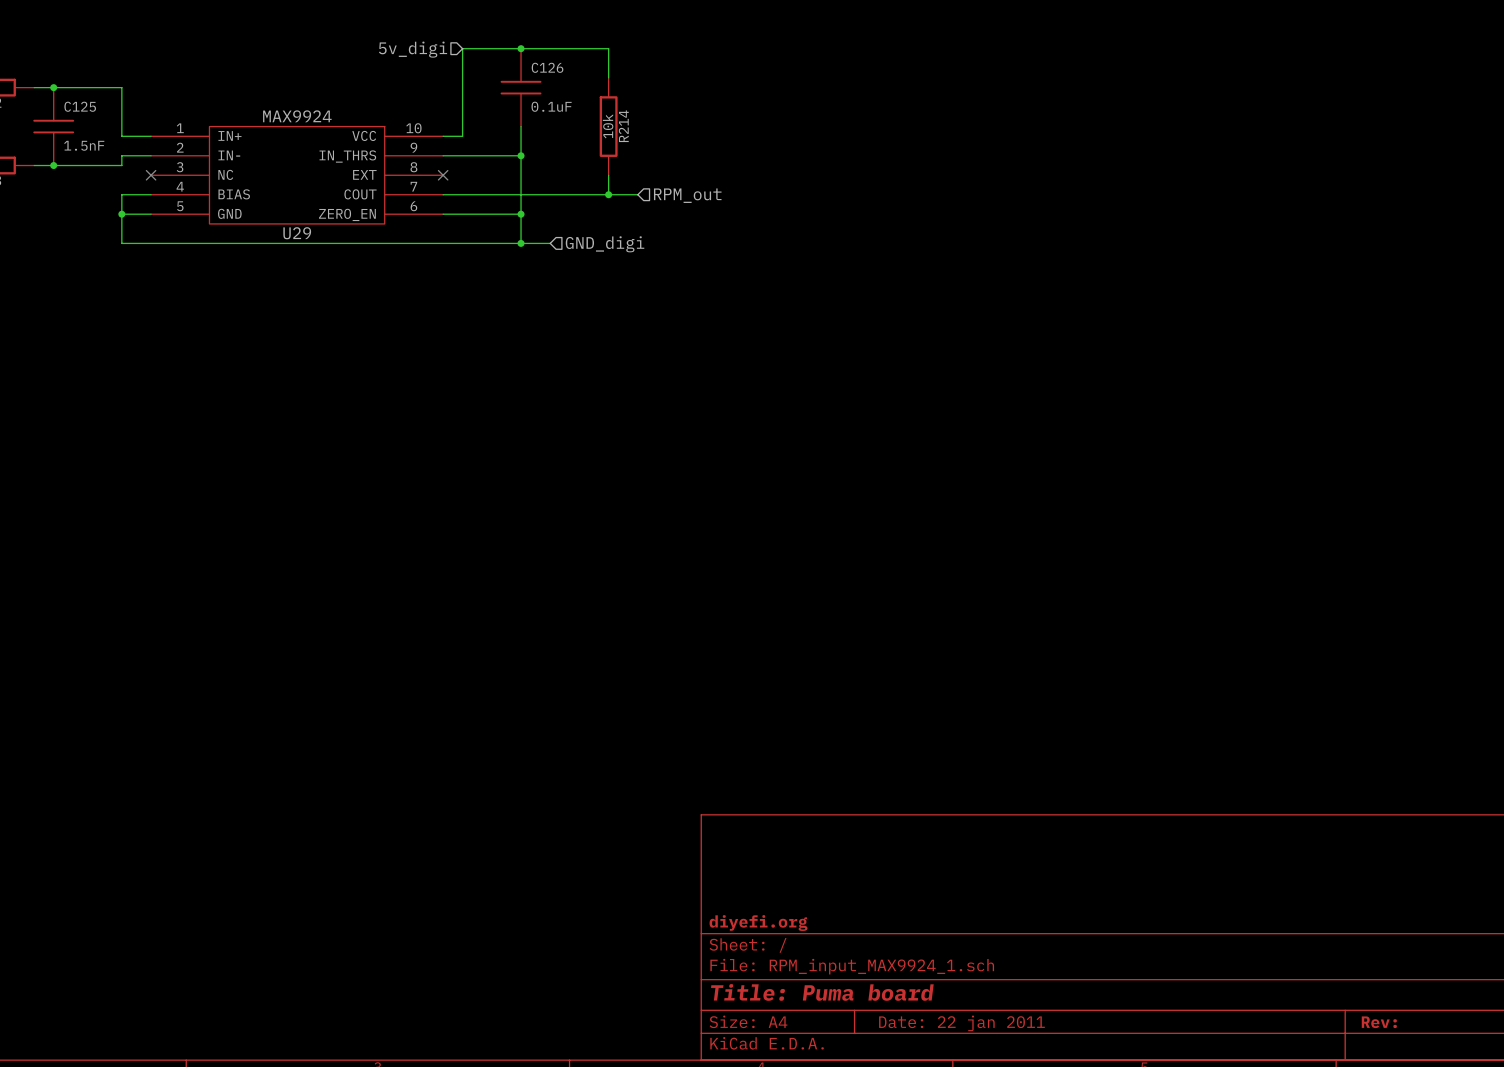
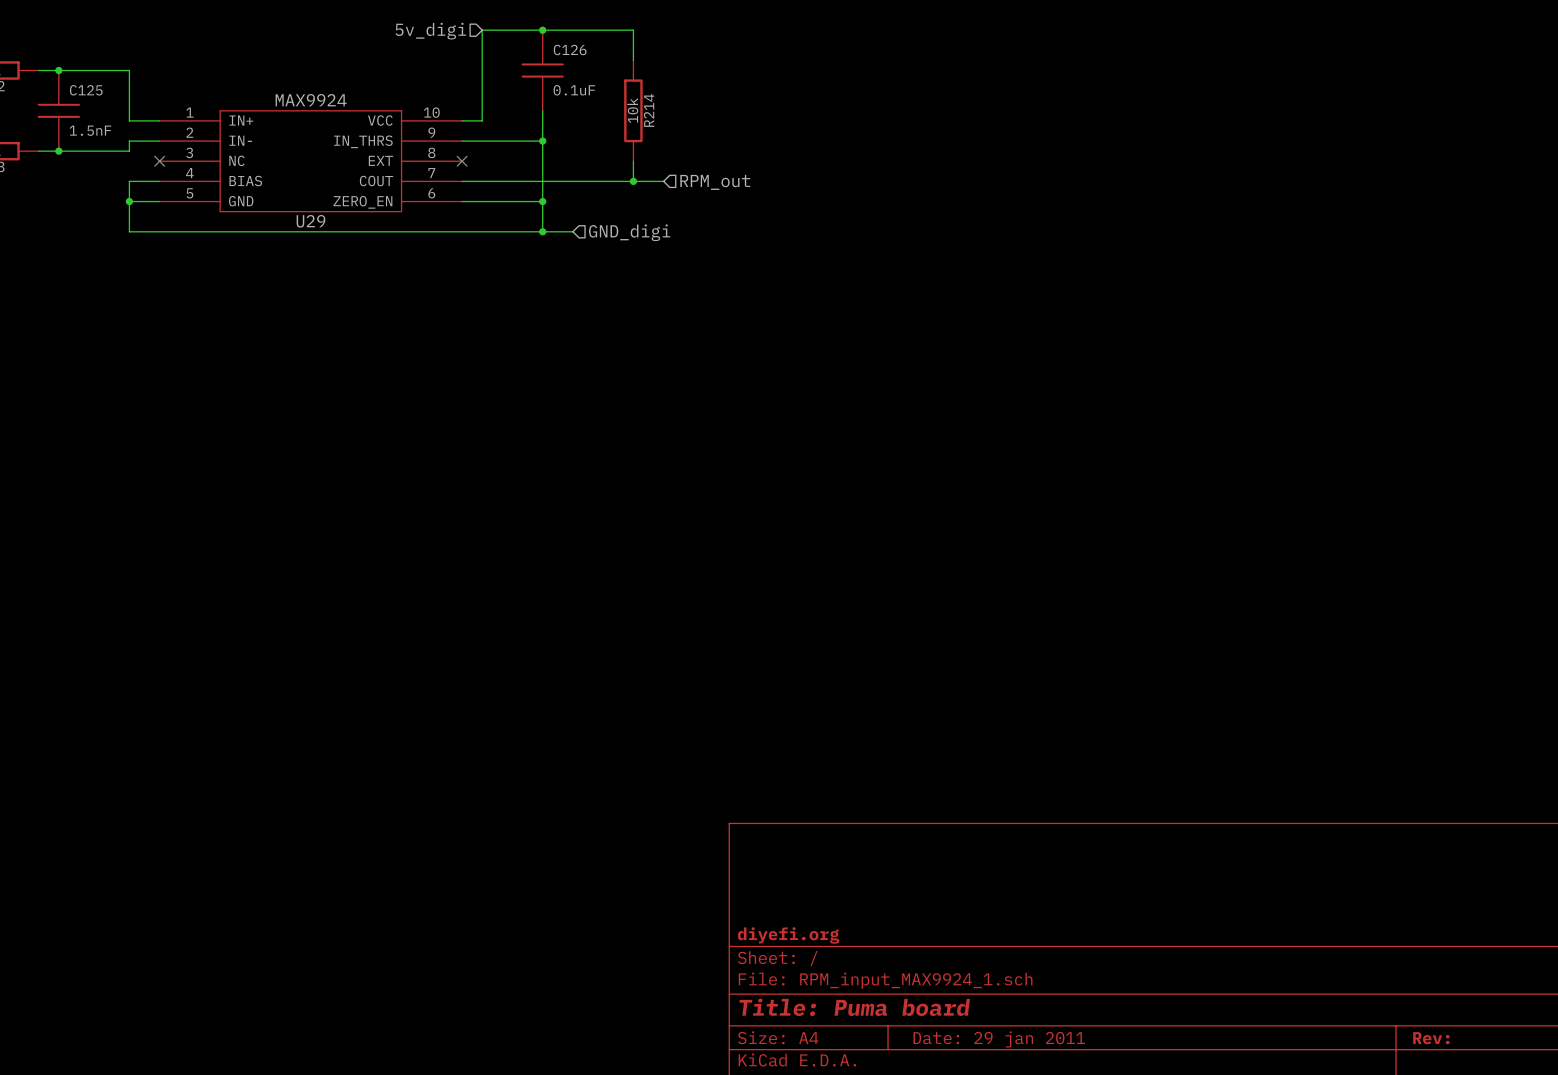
title block: Date: 22 jan 2011 (961, 1023) -> Date: 29 jan 2011 (999, 1039)

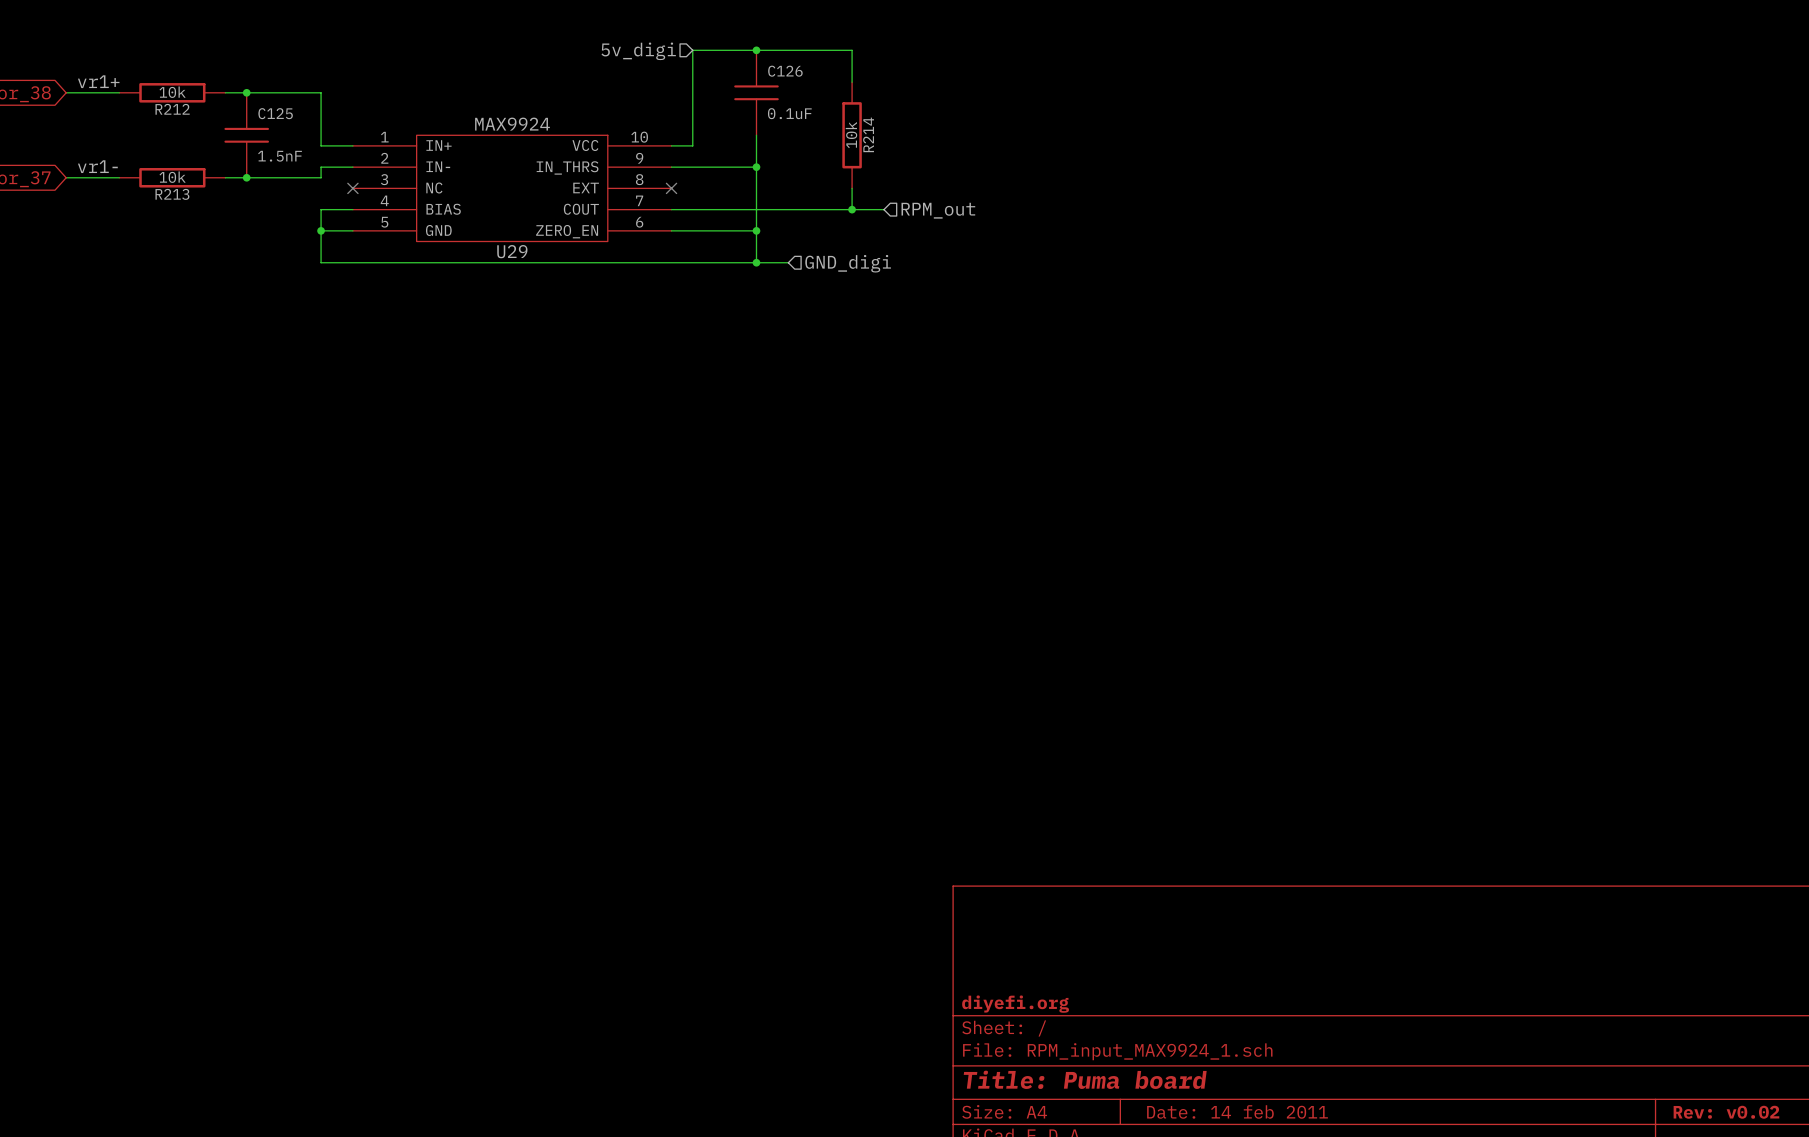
title block: Rev: (1431, 1038) -> Rev: v0.02 (1726, 1112)
title block: Date: 29 jan 2011 (999, 1039) -> Date: 14 feb 2011 (1237, 1111)

